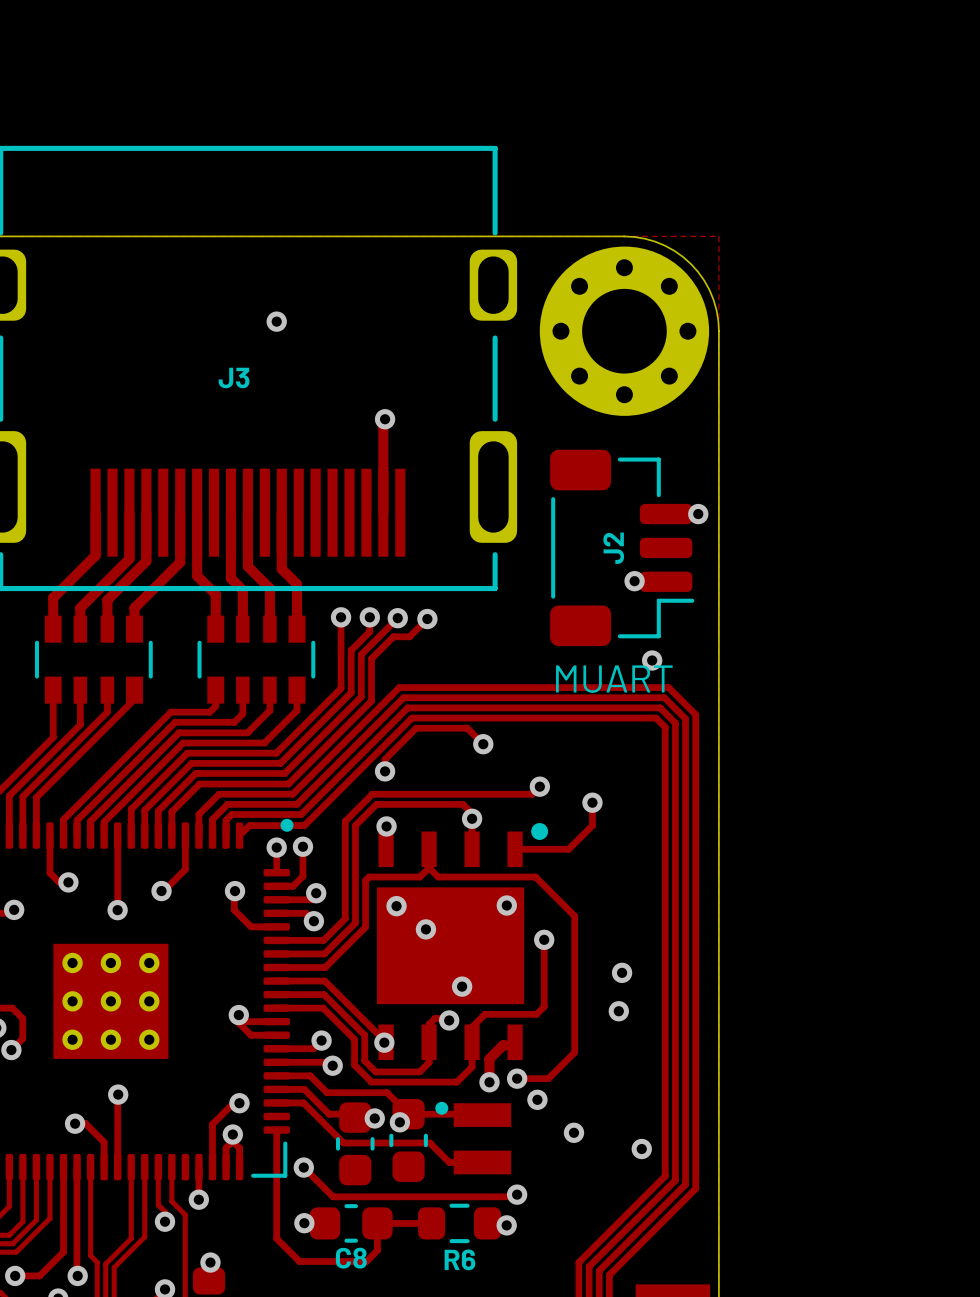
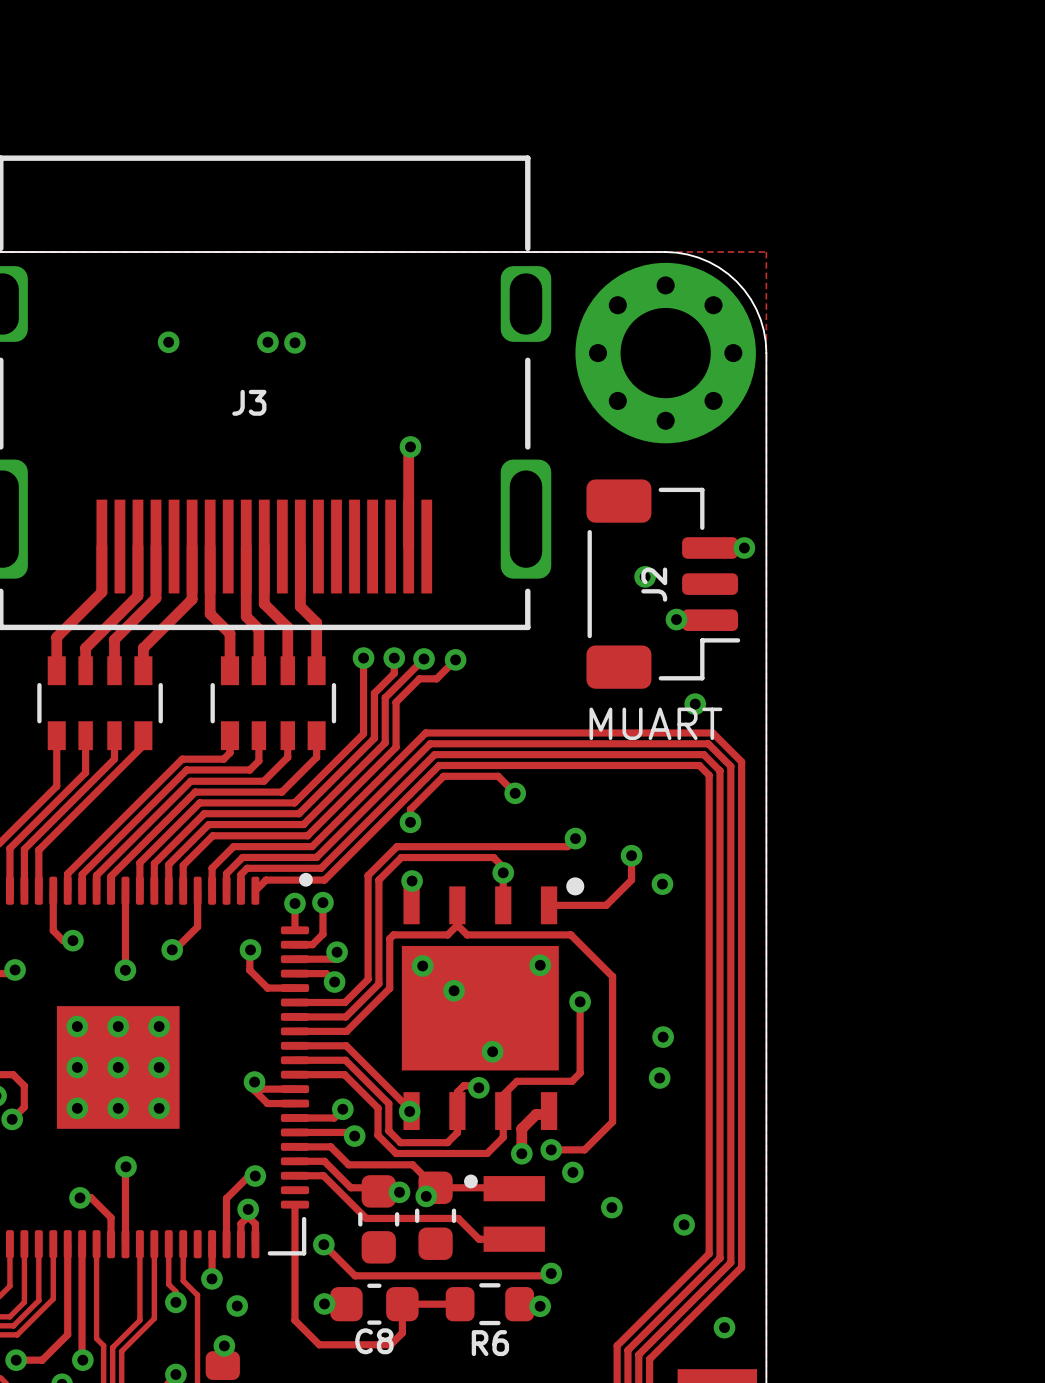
via: none -> (168, 342)
via: none -> (267, 342)
via: none -> (645, 576)
via: none -> (662, 884)
via: none -> (237, 1305)
via: none -> (724, 1327)

